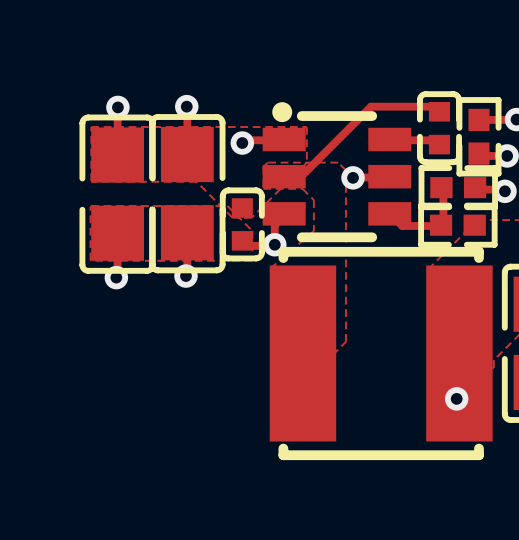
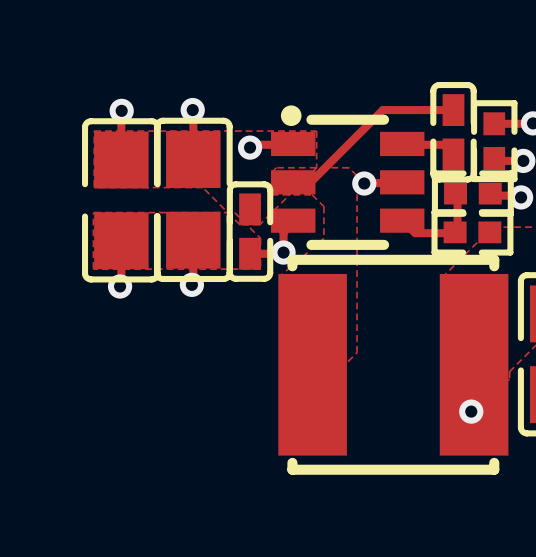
part footprint: [416, 91, 462, 166] -> [430, 82, 477, 183]
part footprint: [219, 187, 265, 262] -> [226, 181, 274, 282]

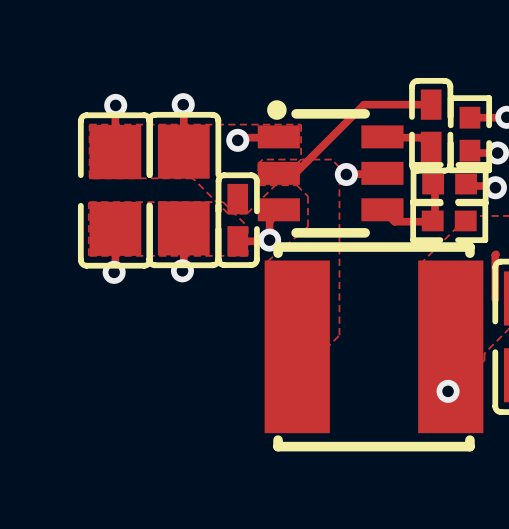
track: none -> (496, 254) (495, 299)

